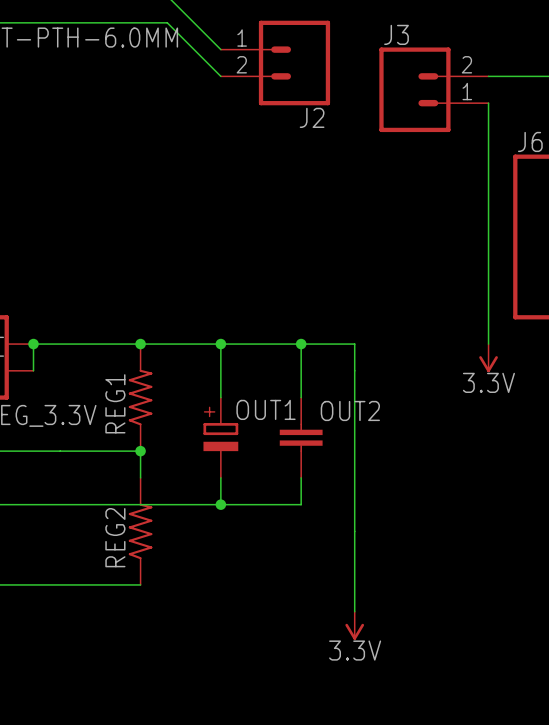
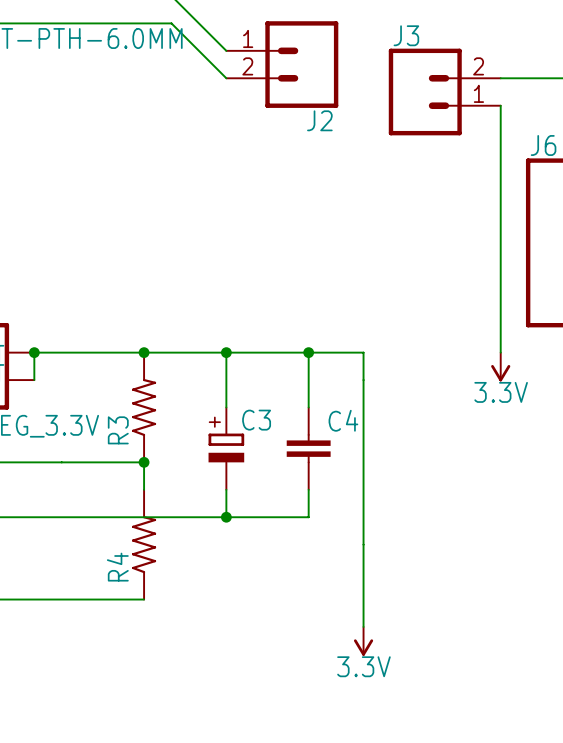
REG1 name: REG1 (115, 403) -> R3 (118, 430)
OUT1 name: OUT1 (266, 409) -> C3 (256, 420)
OUT2 name: OUT2 (350, 410) -> C4 (343, 420)
REG2 name: REG2 (115, 537) -> R4 (117, 567)

